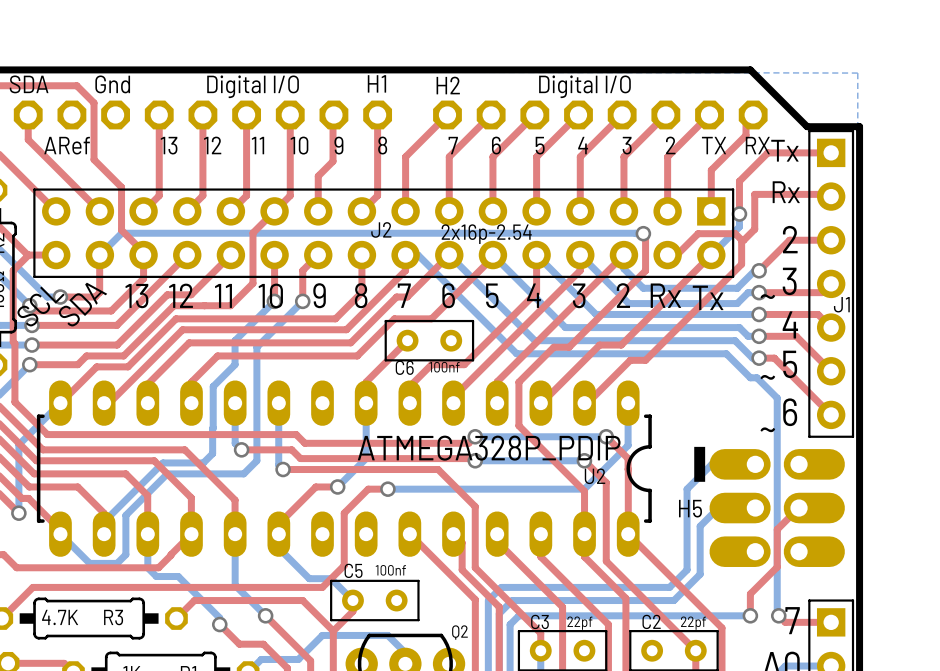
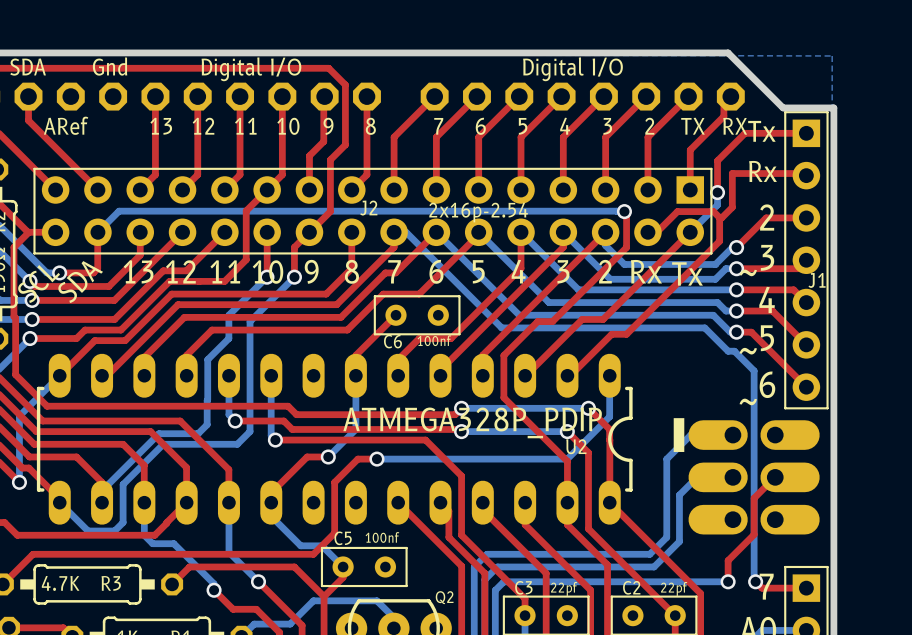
text: H1 (376, 83) -> none
top track: (76, 85) (94, 102) (94, 159) (121, 187) (121, 230) (143, 252) (143, 255) -> (75, 68) (328, 68) (345, 84) (345, 144) (330, 159) (330, 211) (309, 232)
text: H2 (448, 85) -> none
text: H5 (690, 508) -> none

